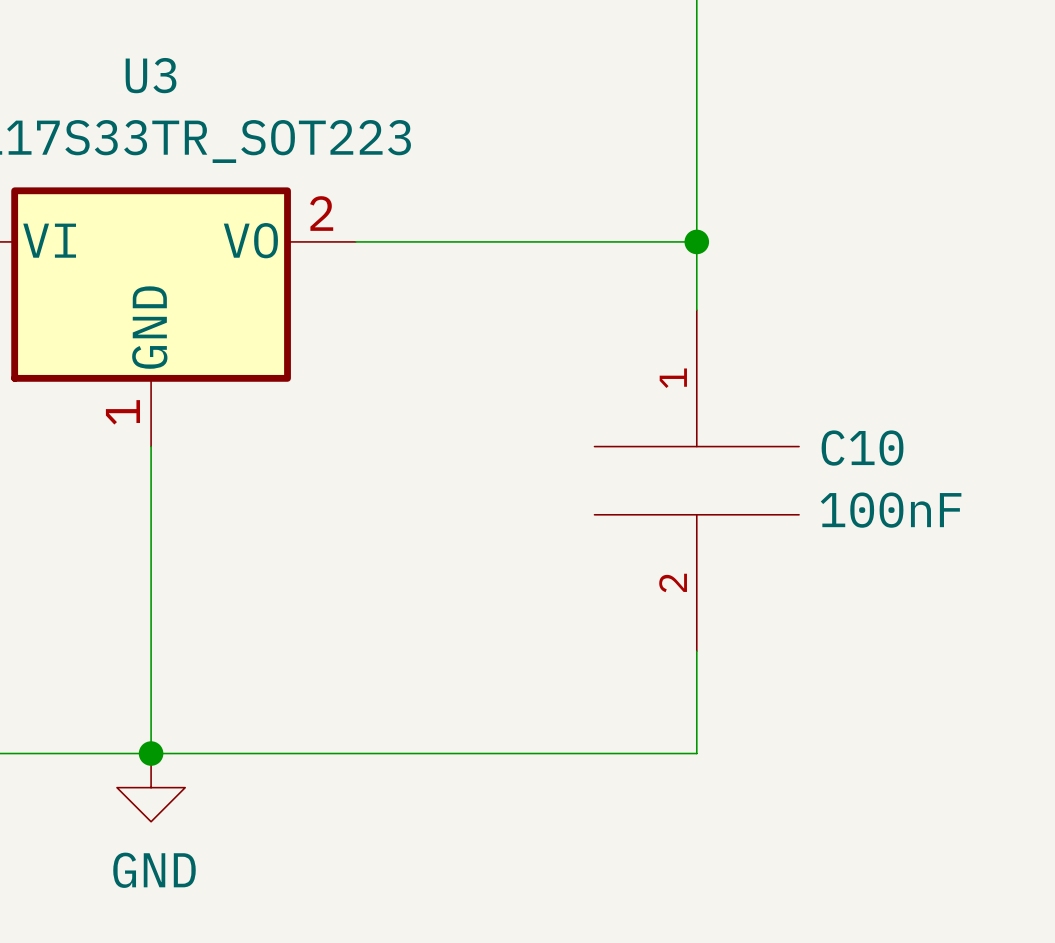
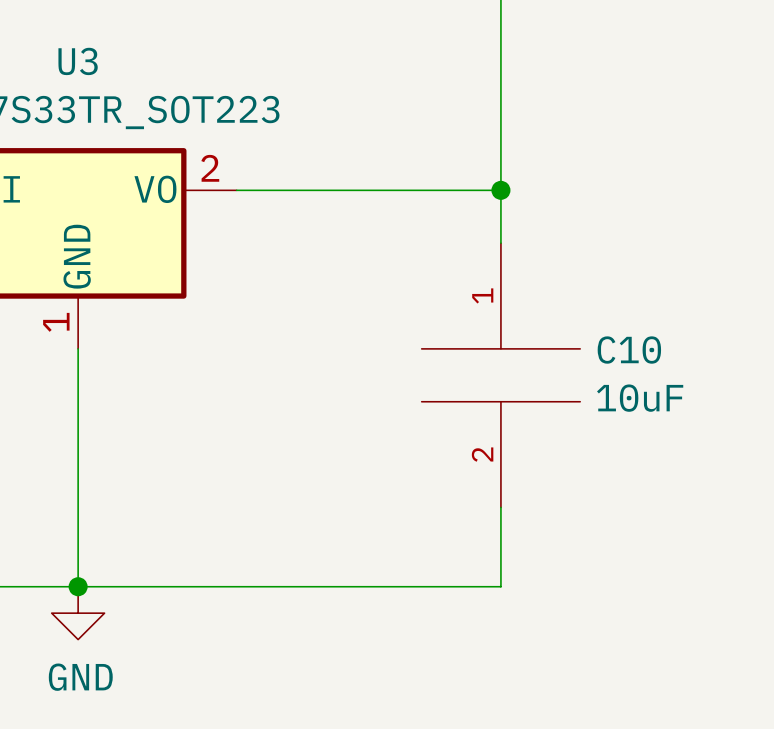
C10 value: 100nF (891, 510) -> 10uF (640, 398)

